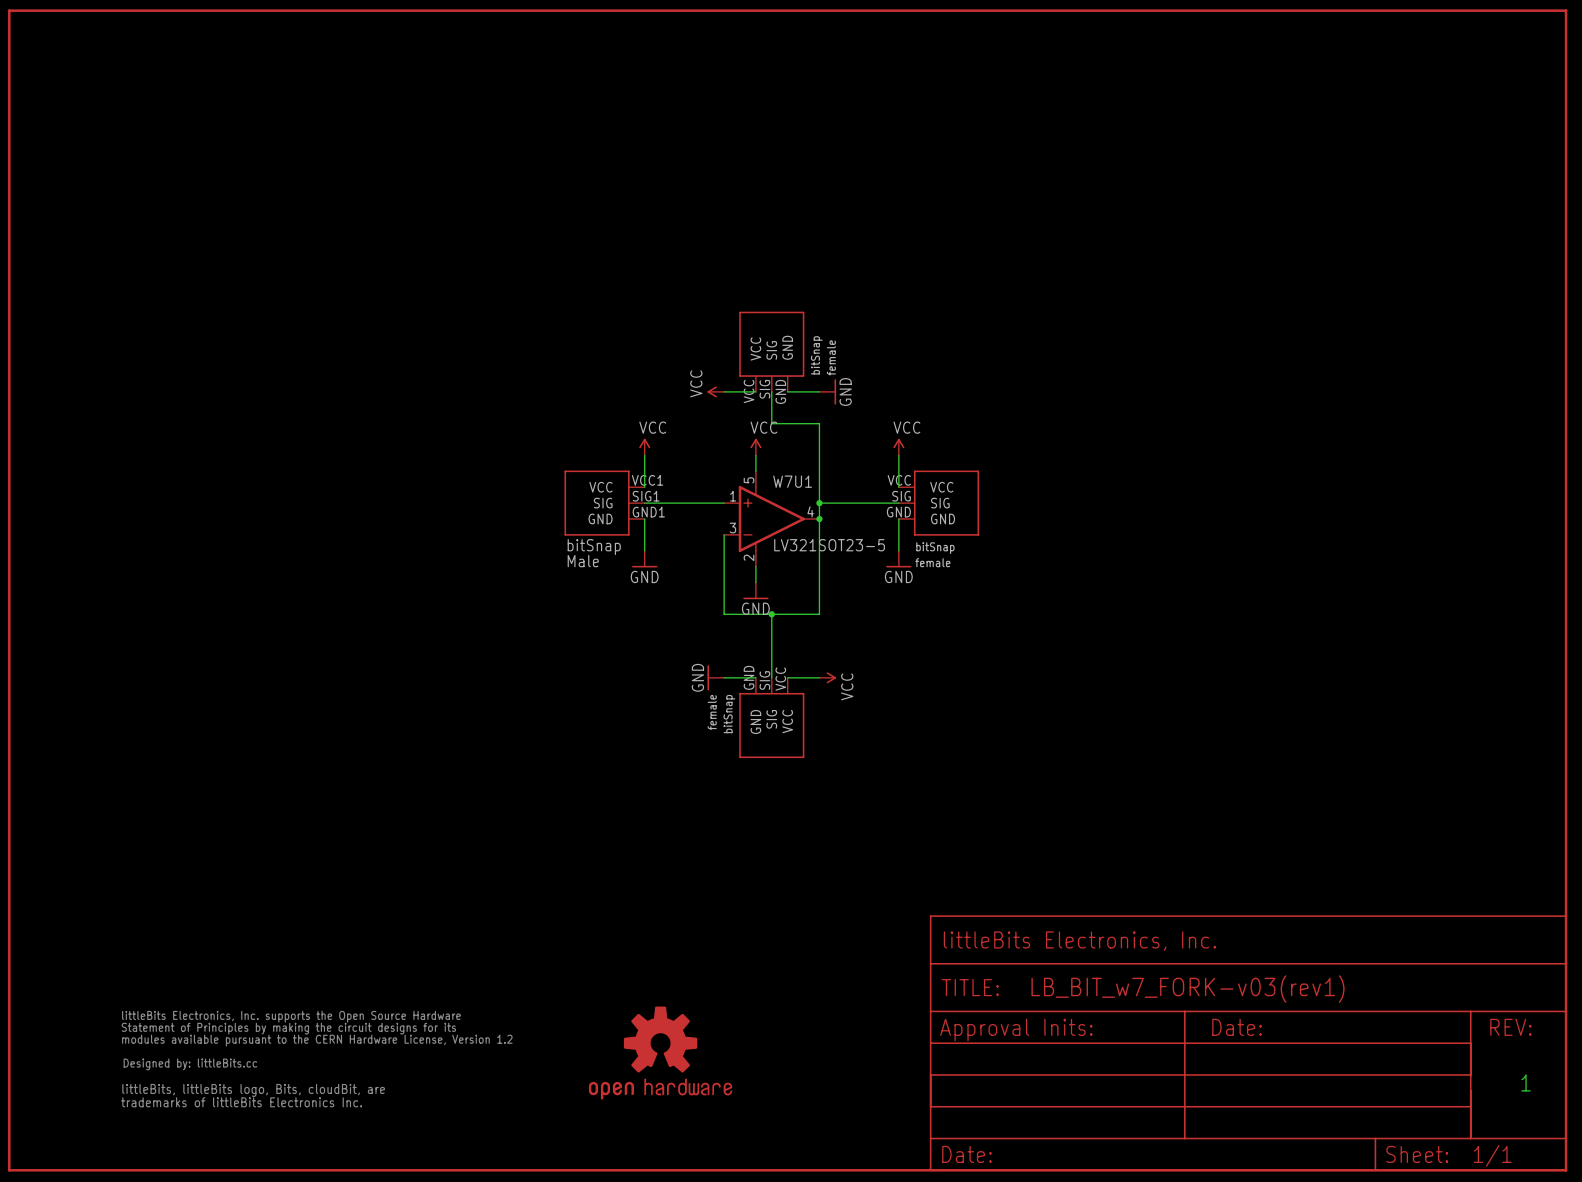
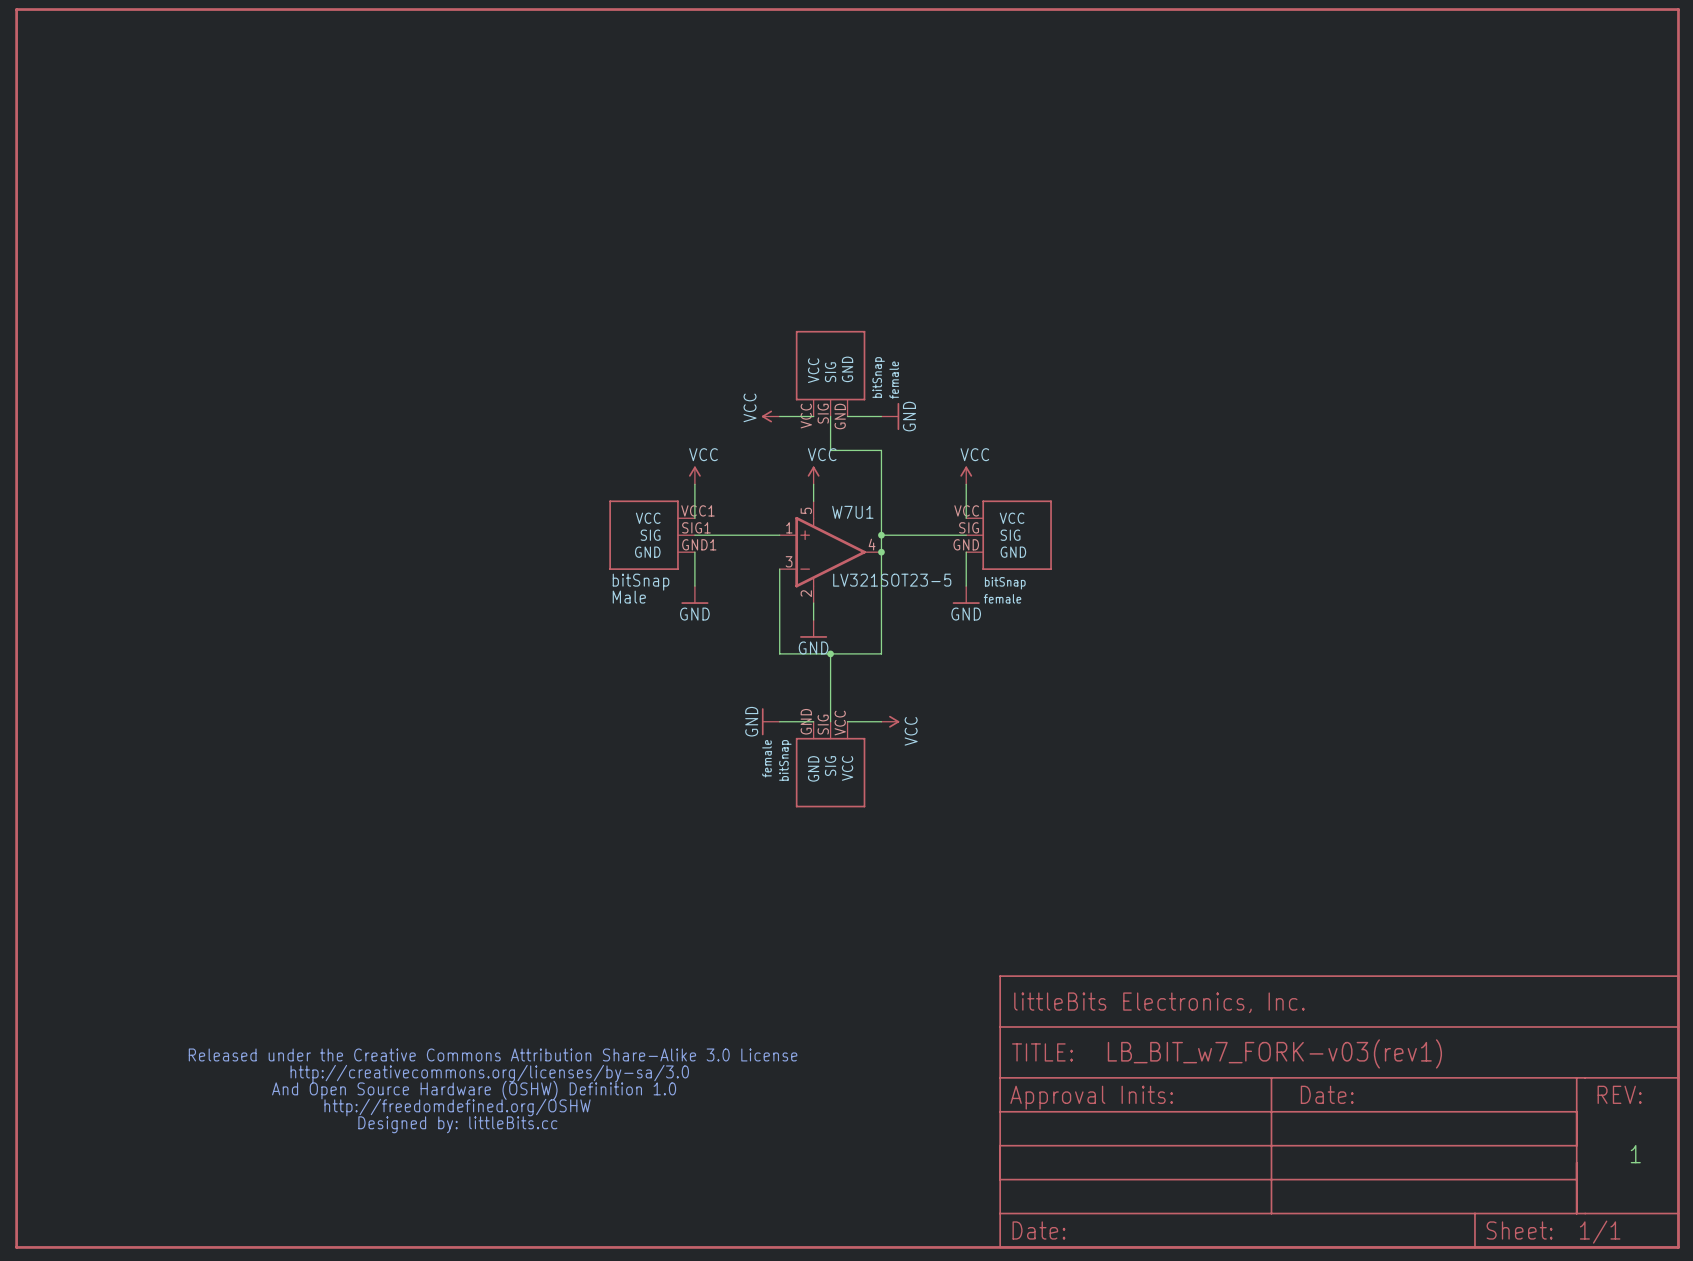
part: none -> (493, 1090)
part: (660, 1053) -> none
part: (316, 1059) -> none

